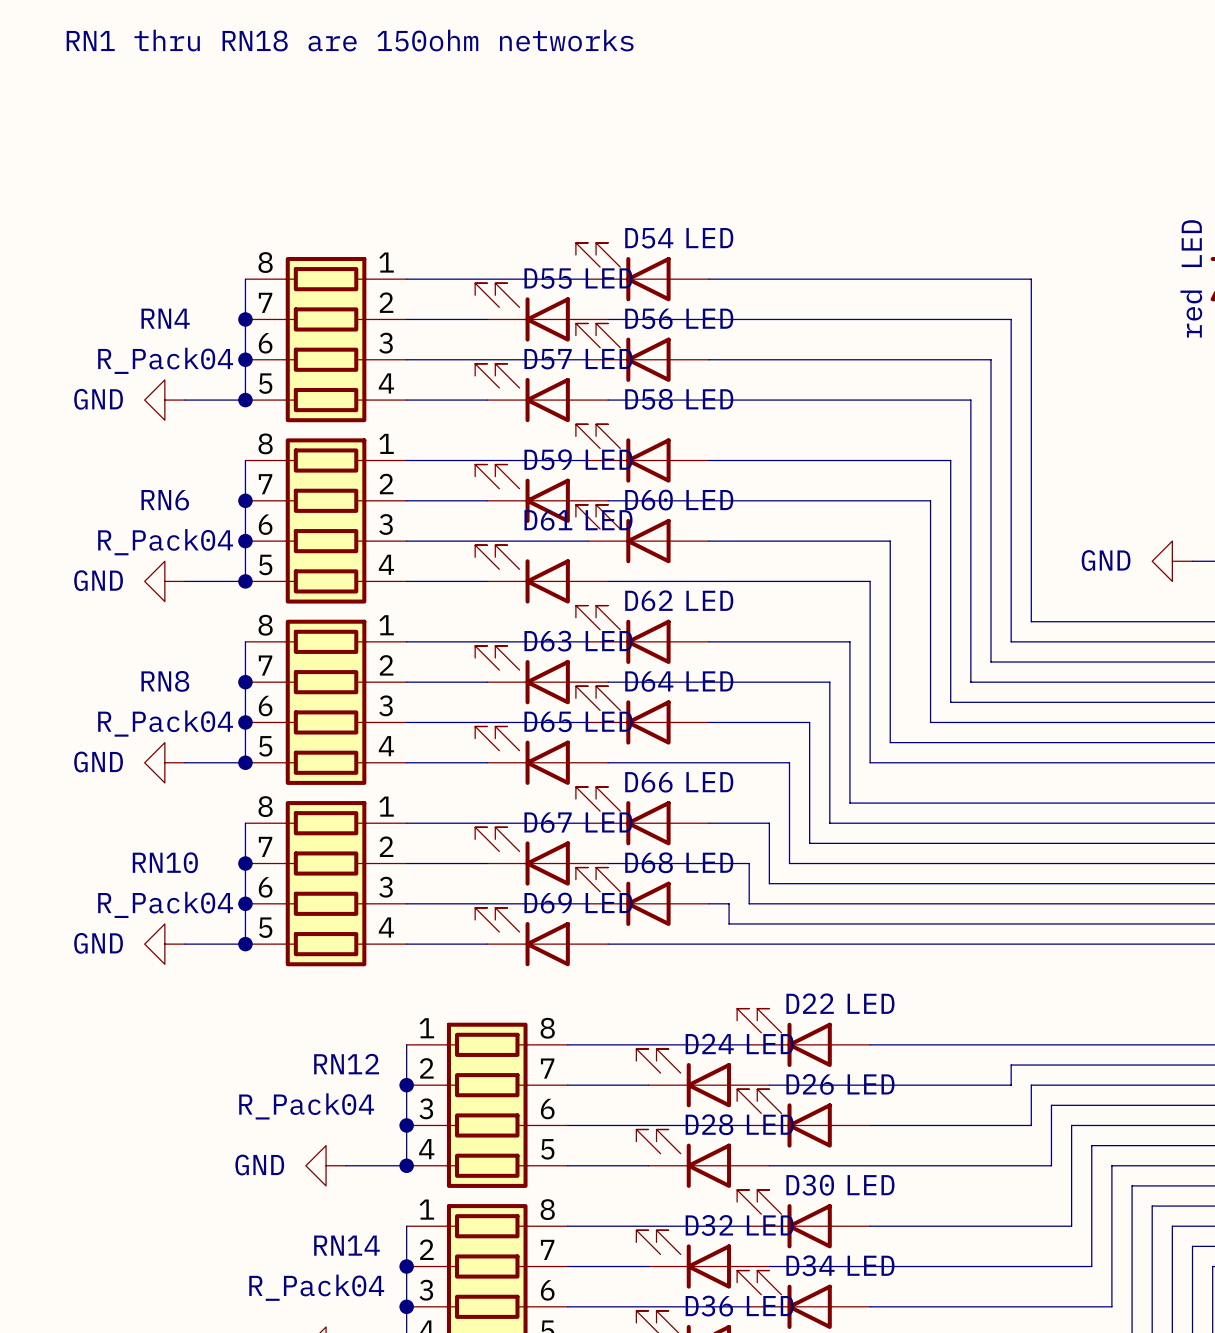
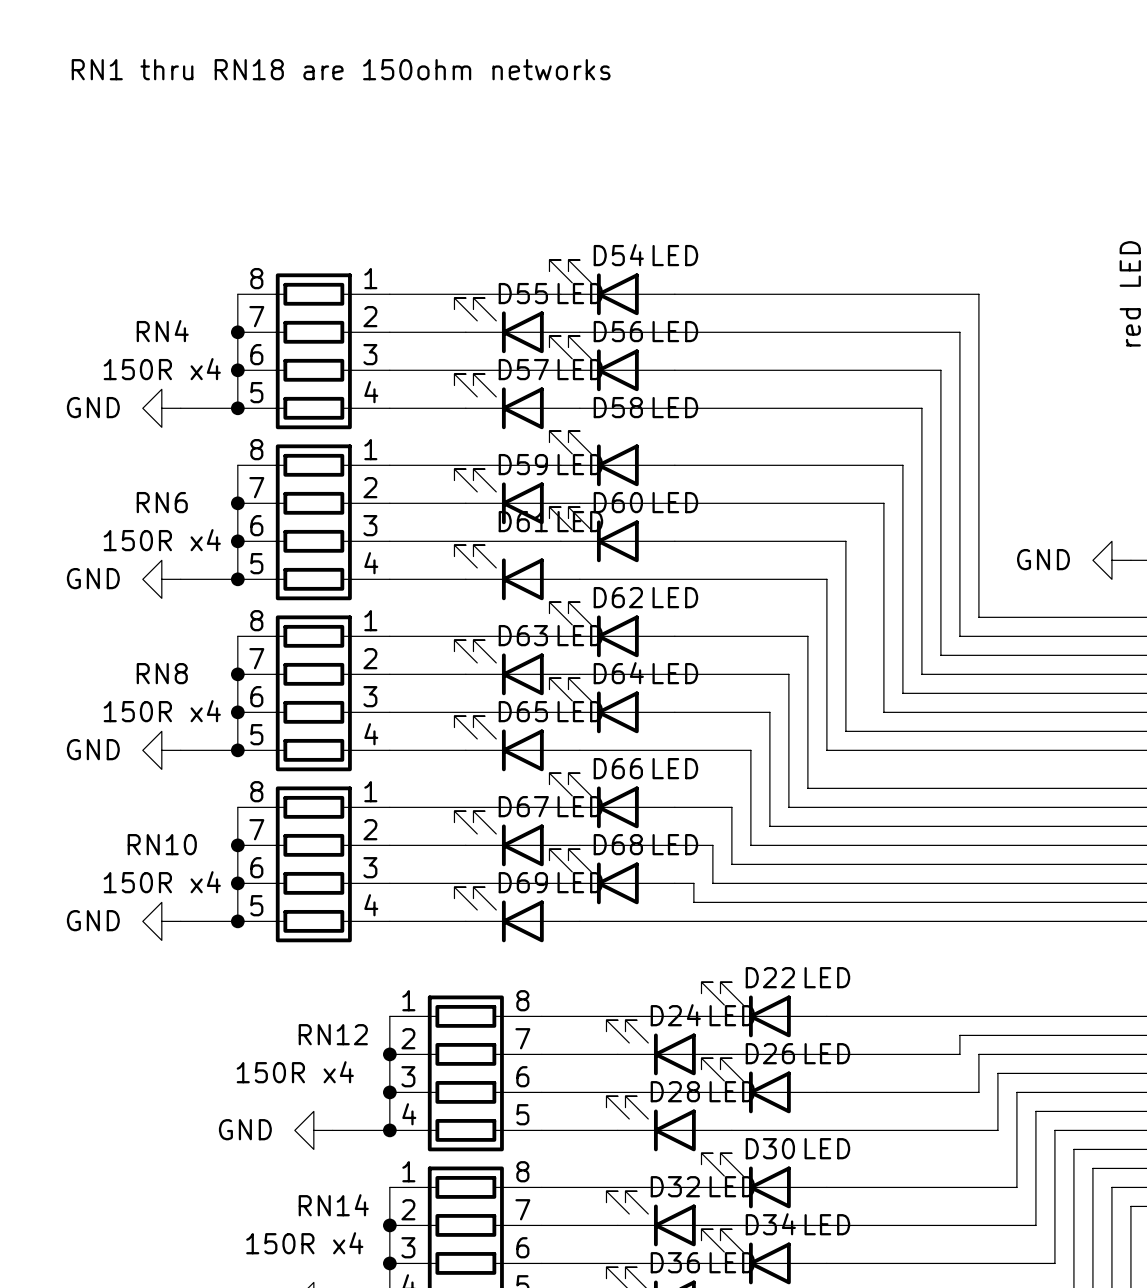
RN4 value: R_Pack04 (165, 360) -> 150R x4 (162, 369)
RN6 value: R_Pack04 (165, 542) -> 150R x4 (162, 540)
RN8 value: R_Pack04 (165, 723) -> 150R x4 (162, 711)
RN10 value: R_Pack04 (165, 904) -> 150R x4 (162, 882)
RN12 value: R_Pack04 (306, 1106) -> 150R x4 (295, 1072)
RN14 value: R_Pack04 (316, 1287) -> 150R x4 (304, 1243)

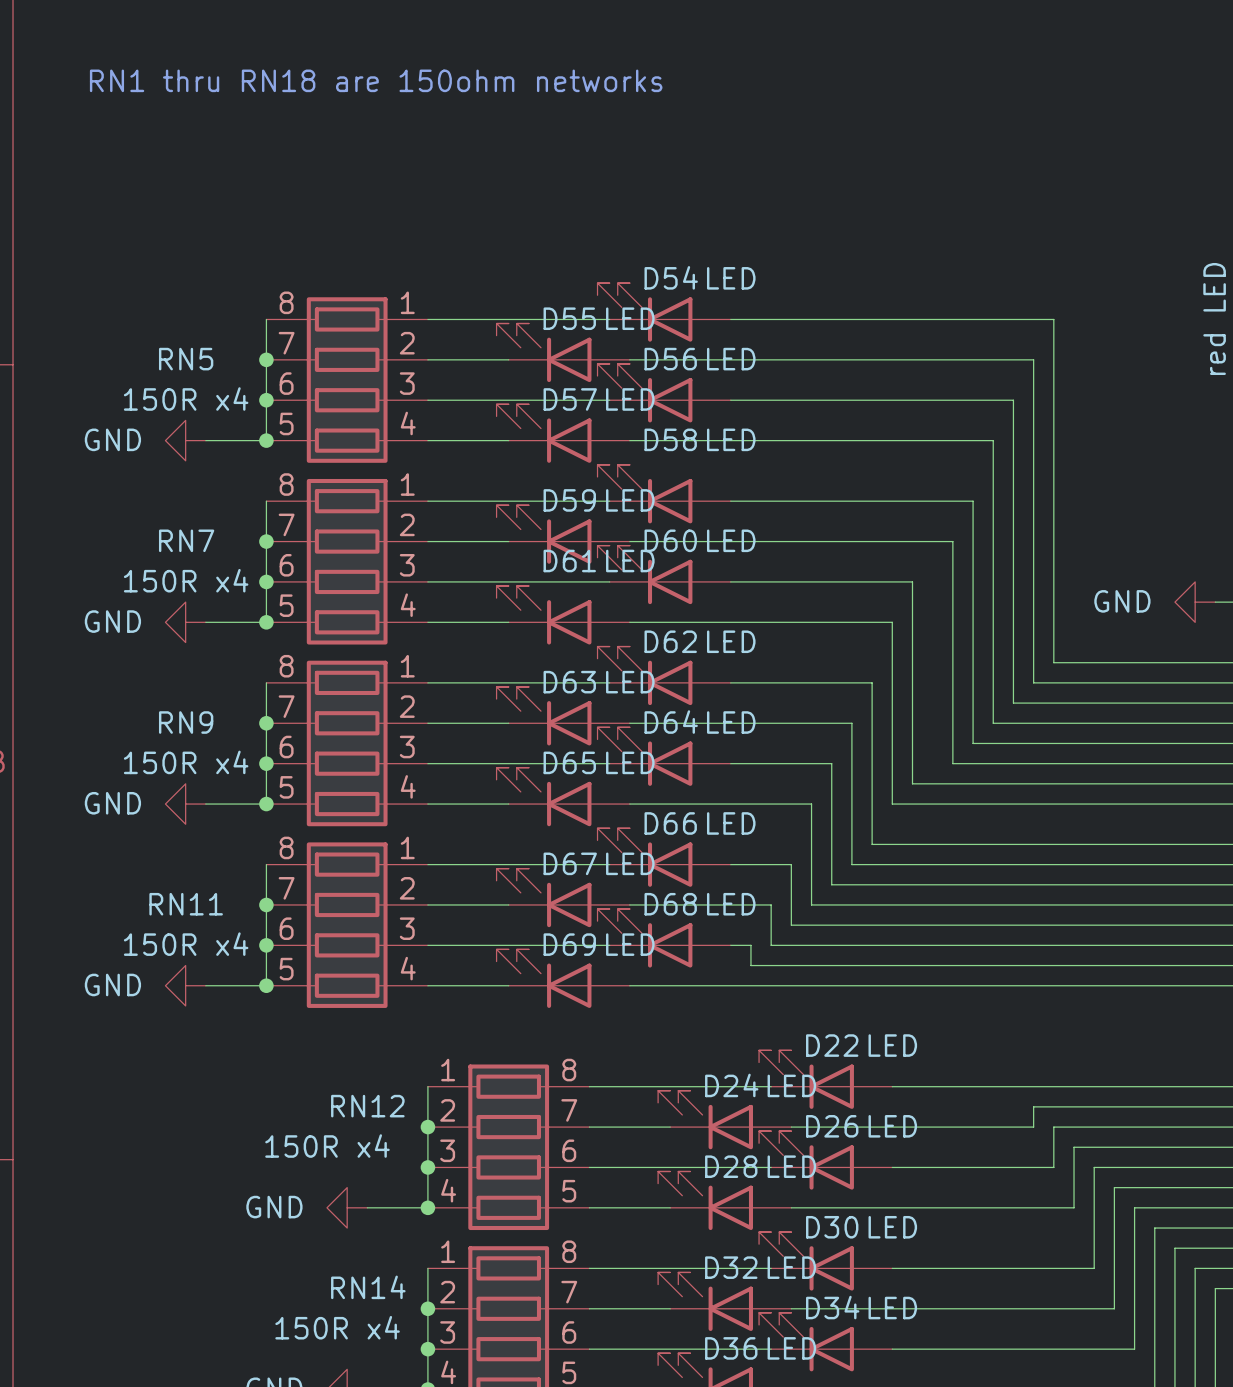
RN4 name: RN4 (162, 331) -> RN5 (186, 359)
RN6 name: RN6 (162, 502) -> RN7 (186, 540)
RN8 name: RN8 (162, 673) -> RN9 (186, 722)
RN10 name: RN10 (162, 844) -> RN11 (186, 904)

